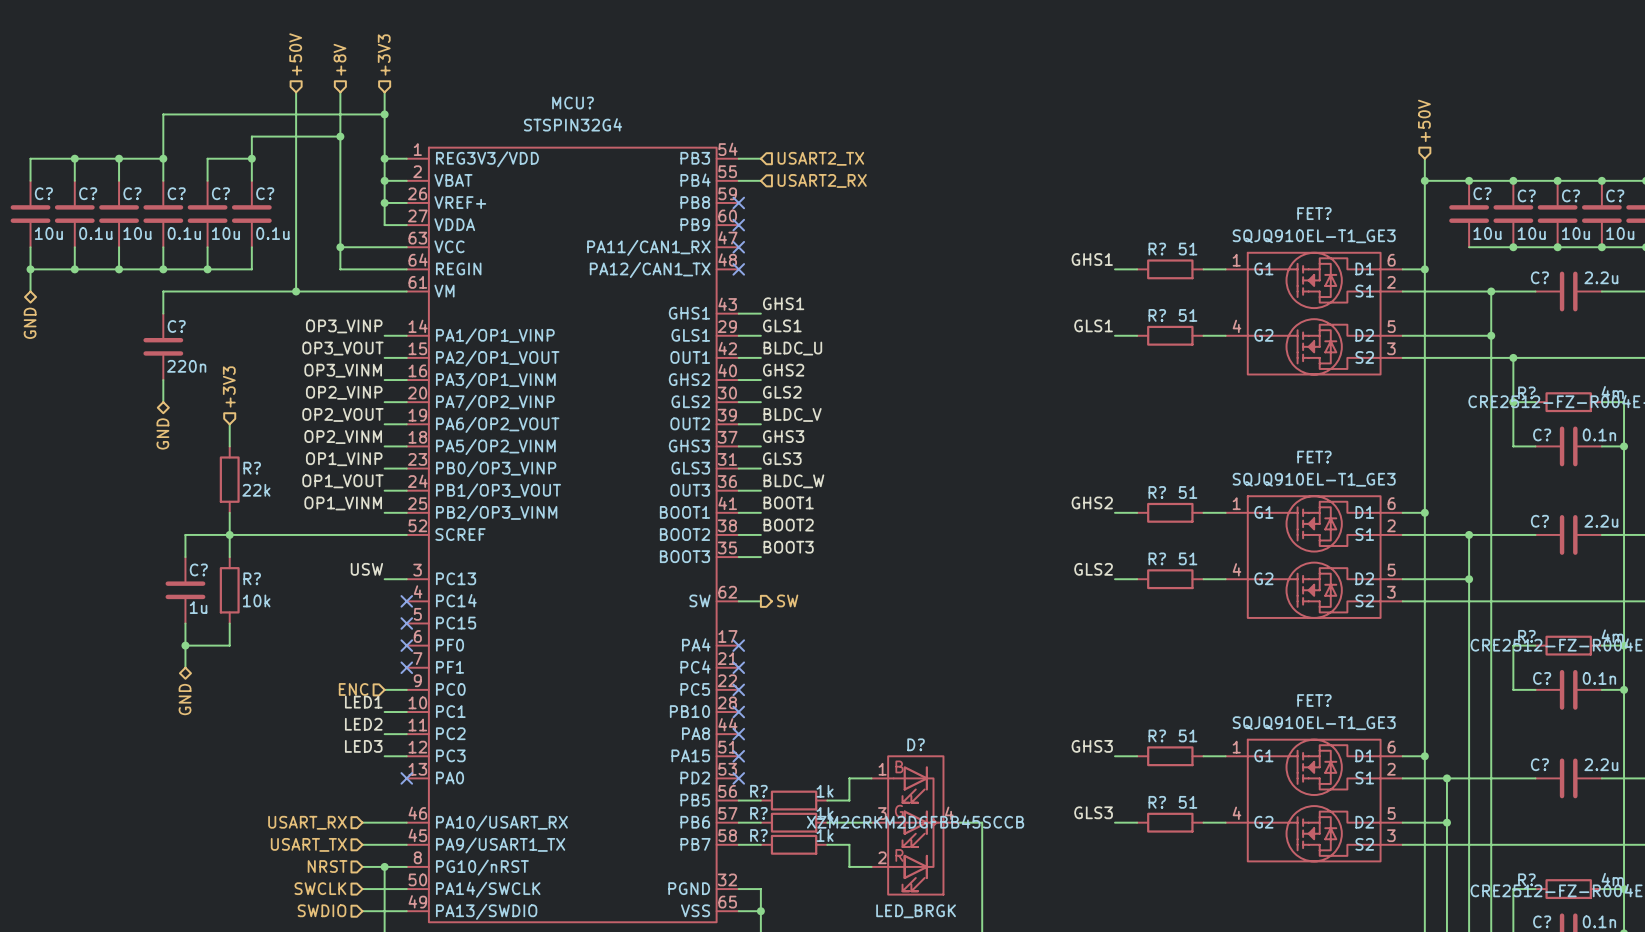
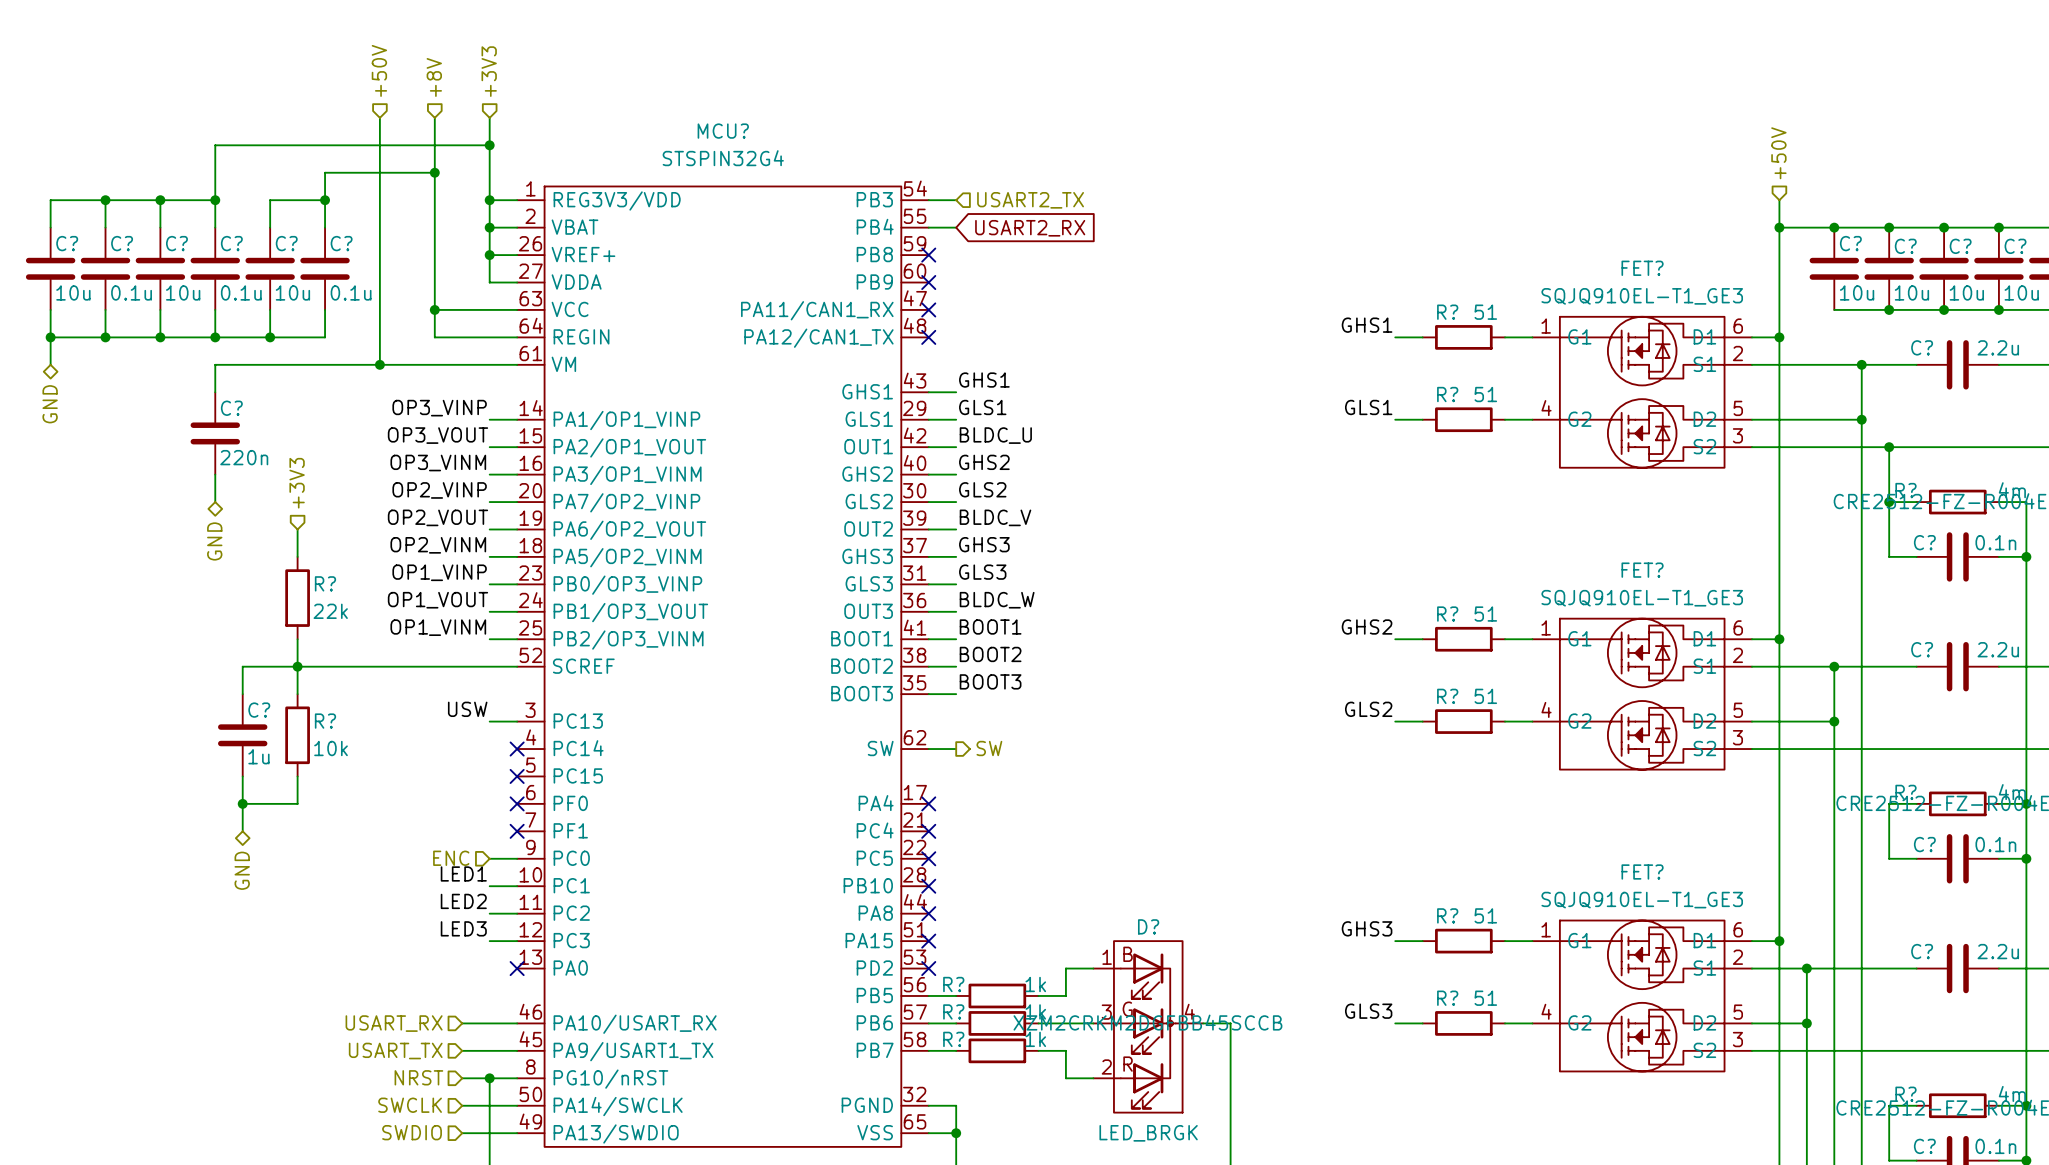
hierarchical label: USART2_RX (822, 180) -> none
global label: none -> USART2_RX (1030, 228)

